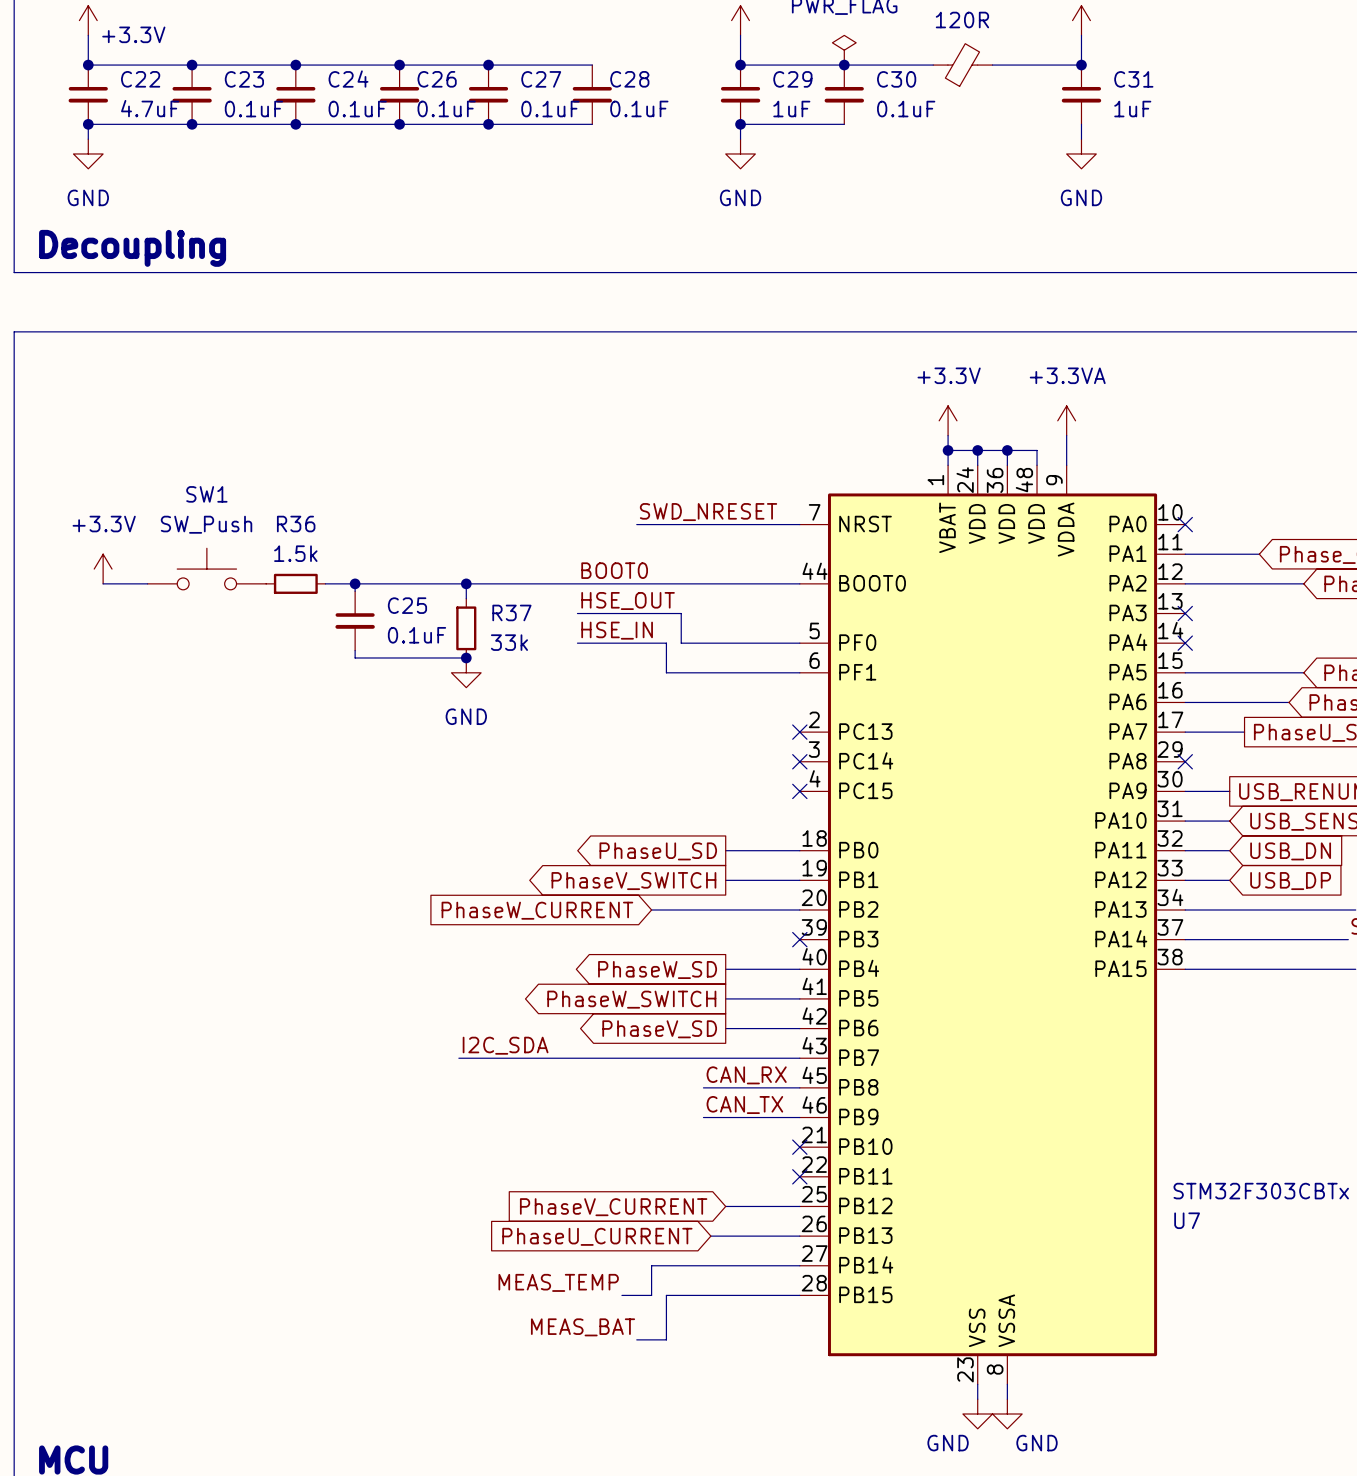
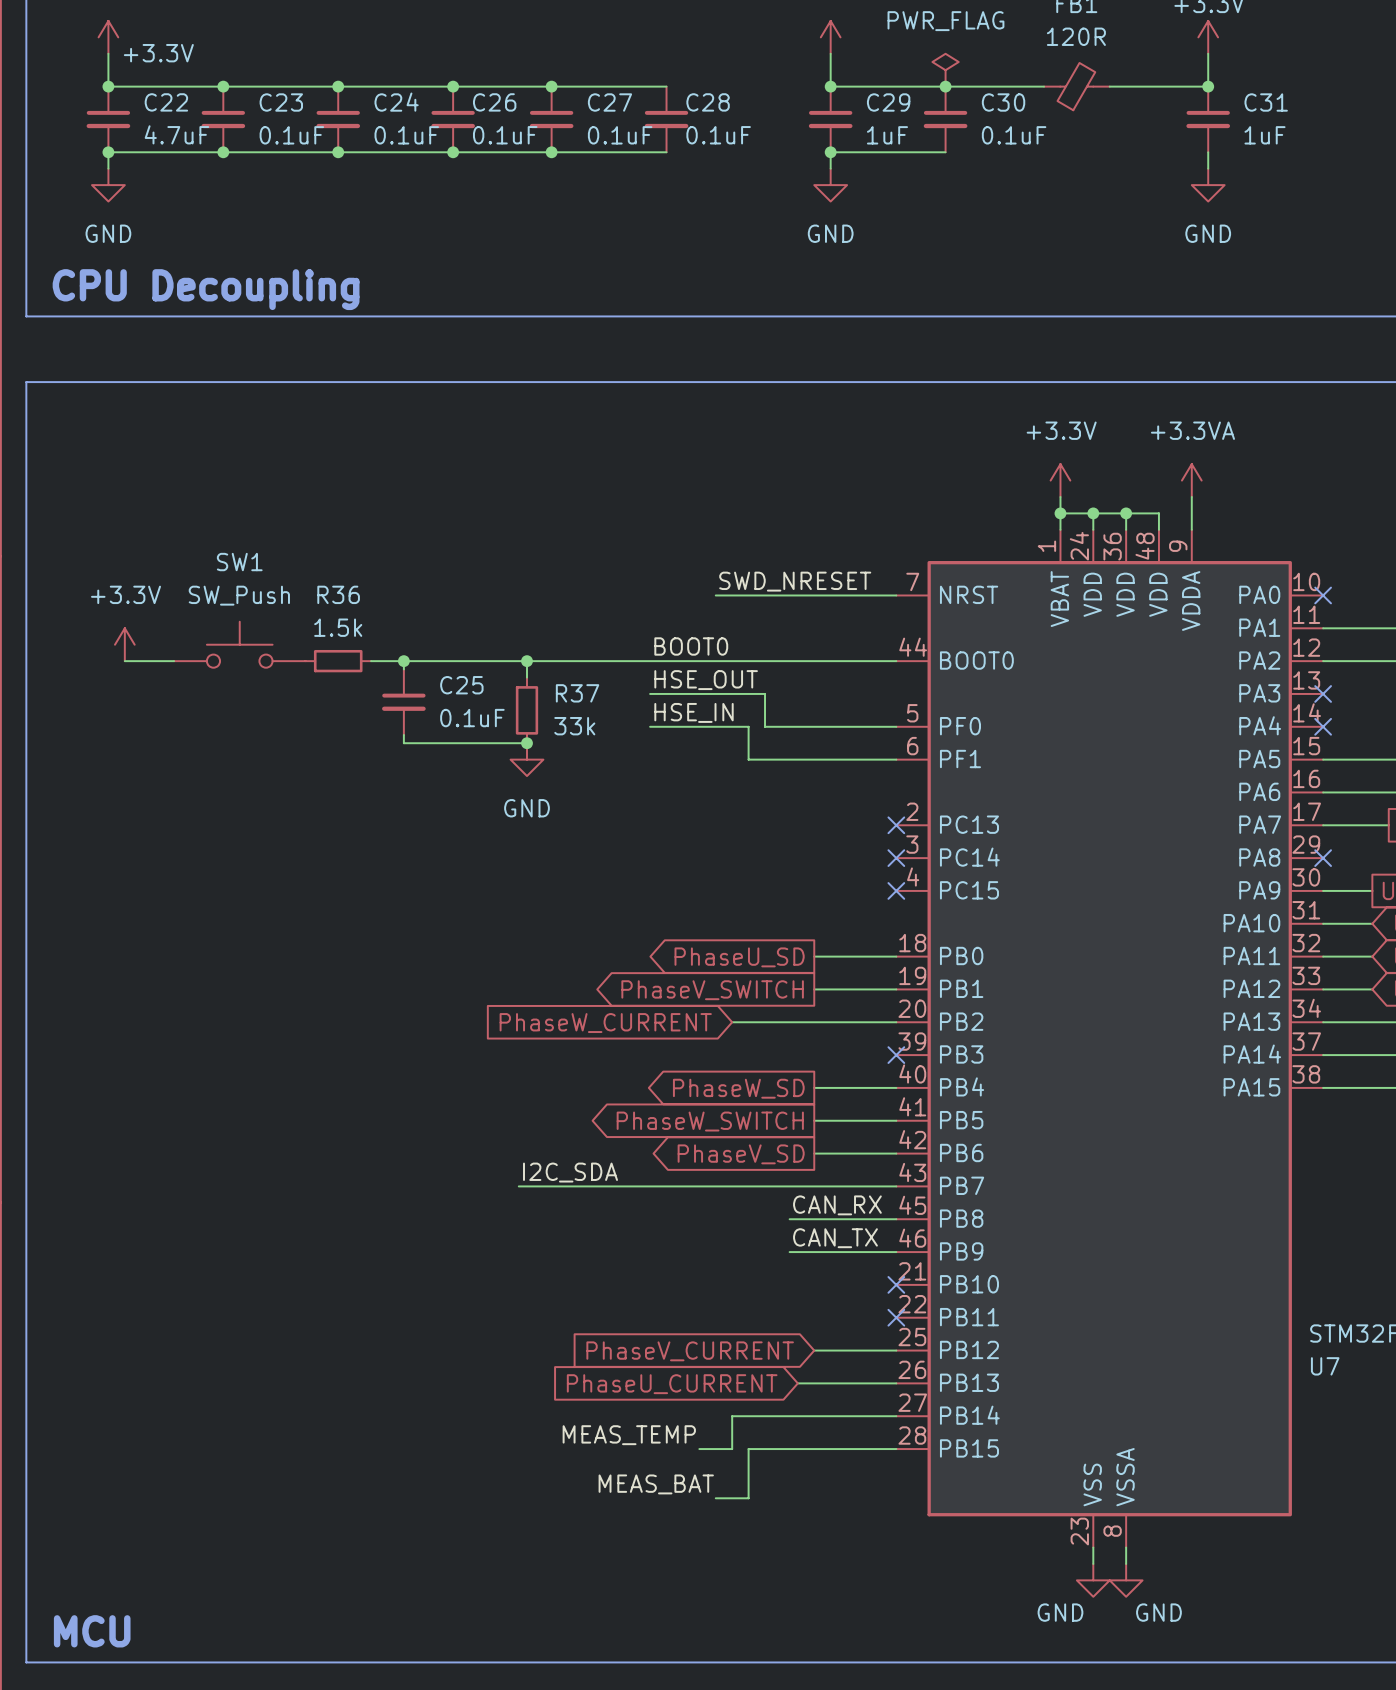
text: Decoupling (132, 248) -> CPU Decoupling (206, 289)

